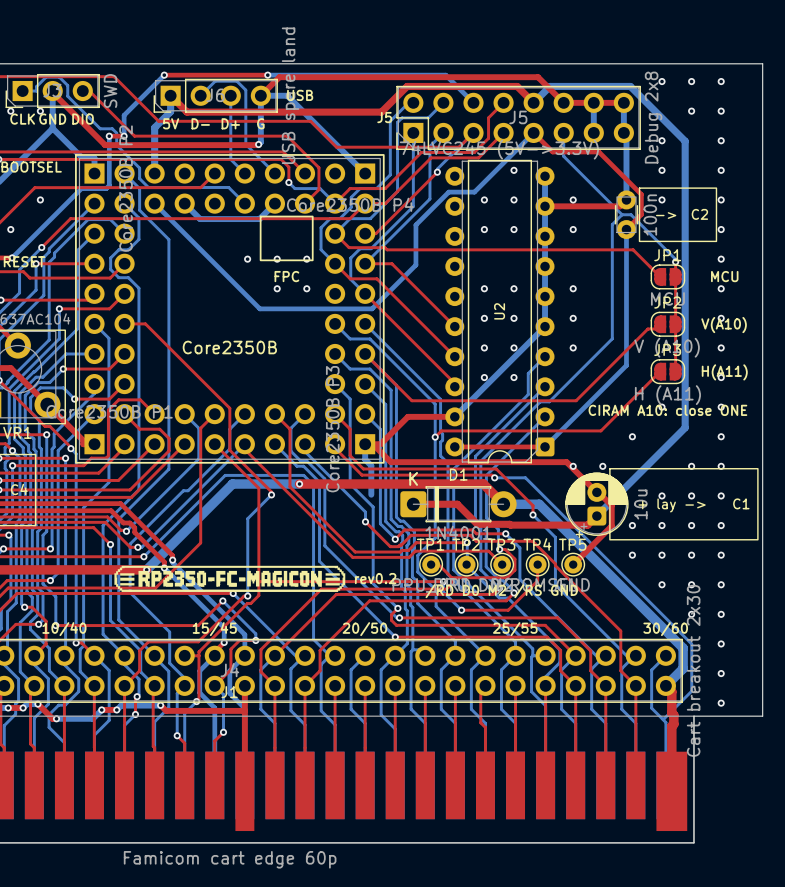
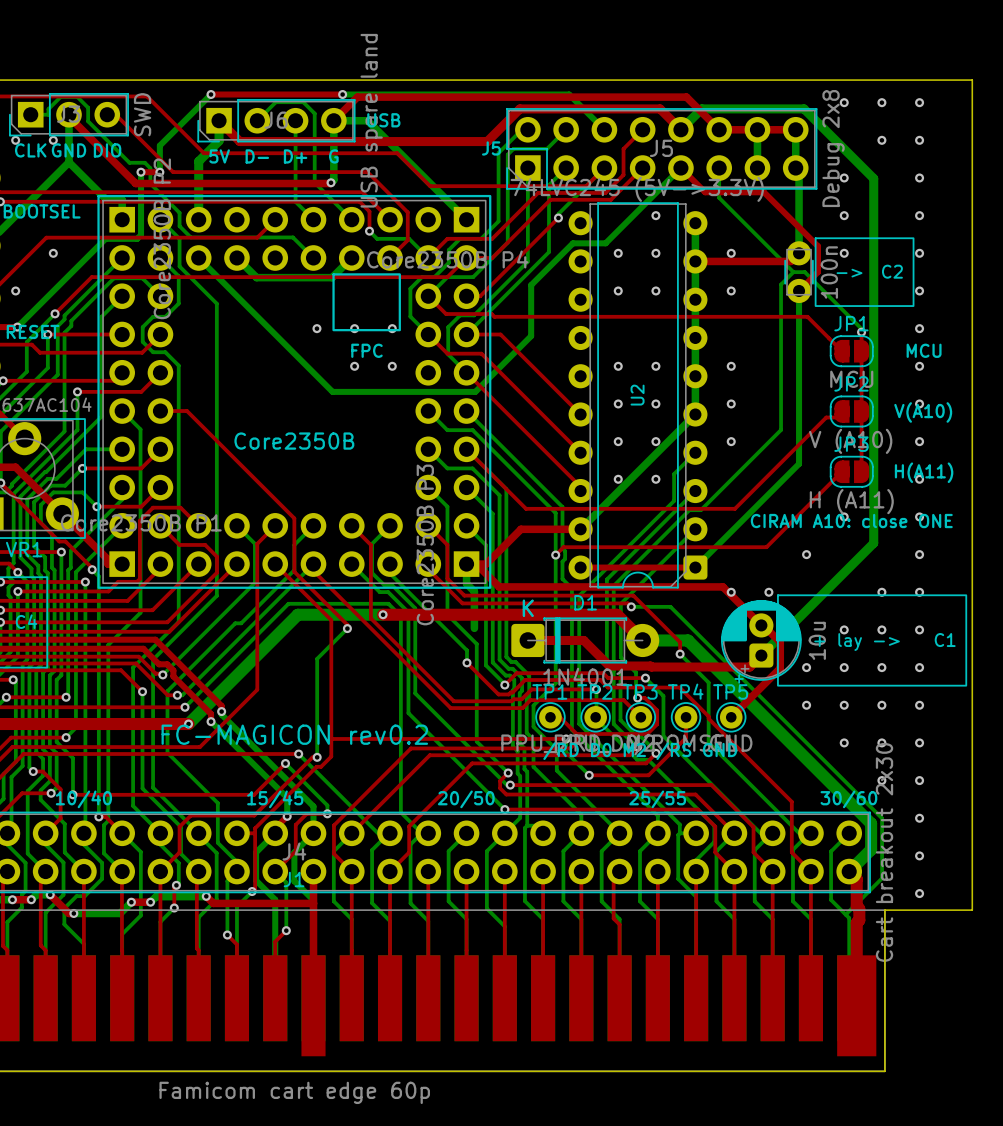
drawing: [114, 565, 346, 592] -> none
text: none -> FC-MAGICON rev0.2 (294, 734)
text: rev0.2 (375, 578) -> none

